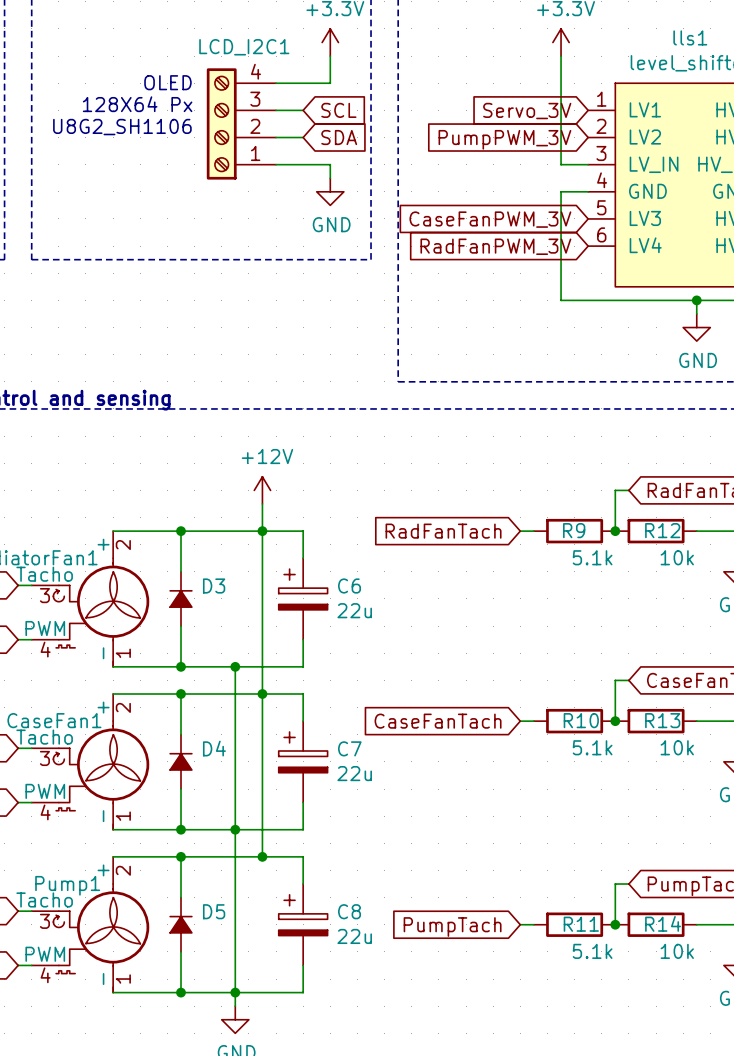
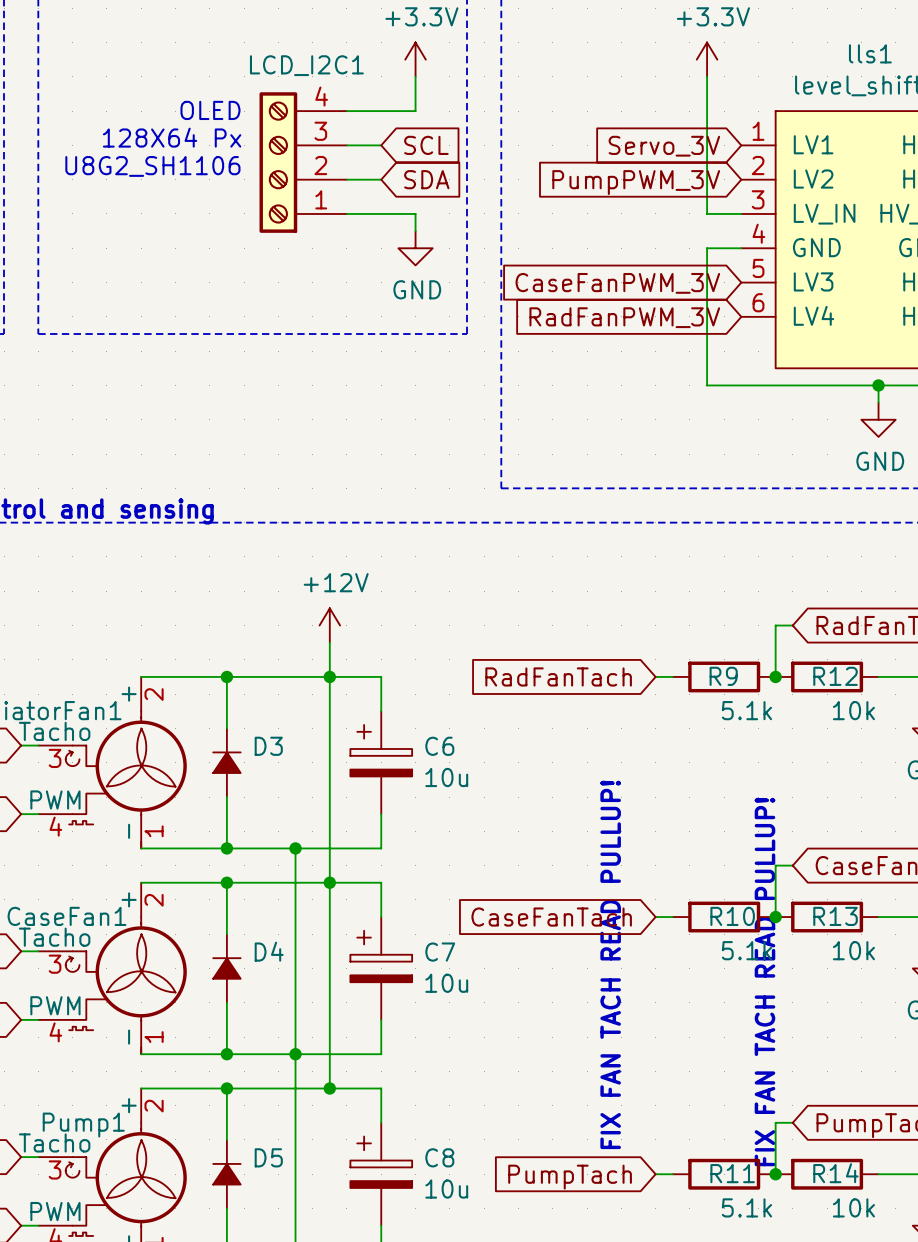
C6 value: 22u (354, 610) -> 10u (446, 777)
text: none -> FIX FAN TACH READ PULLUP! (610, 964)
text: none -> FIX FAN TACH READ PULLUP! (764, 982)
C7 value: 22u (354, 773) -> 10u (446, 983)
C8 value: 22u (354, 936) -> 10u (446, 1189)

